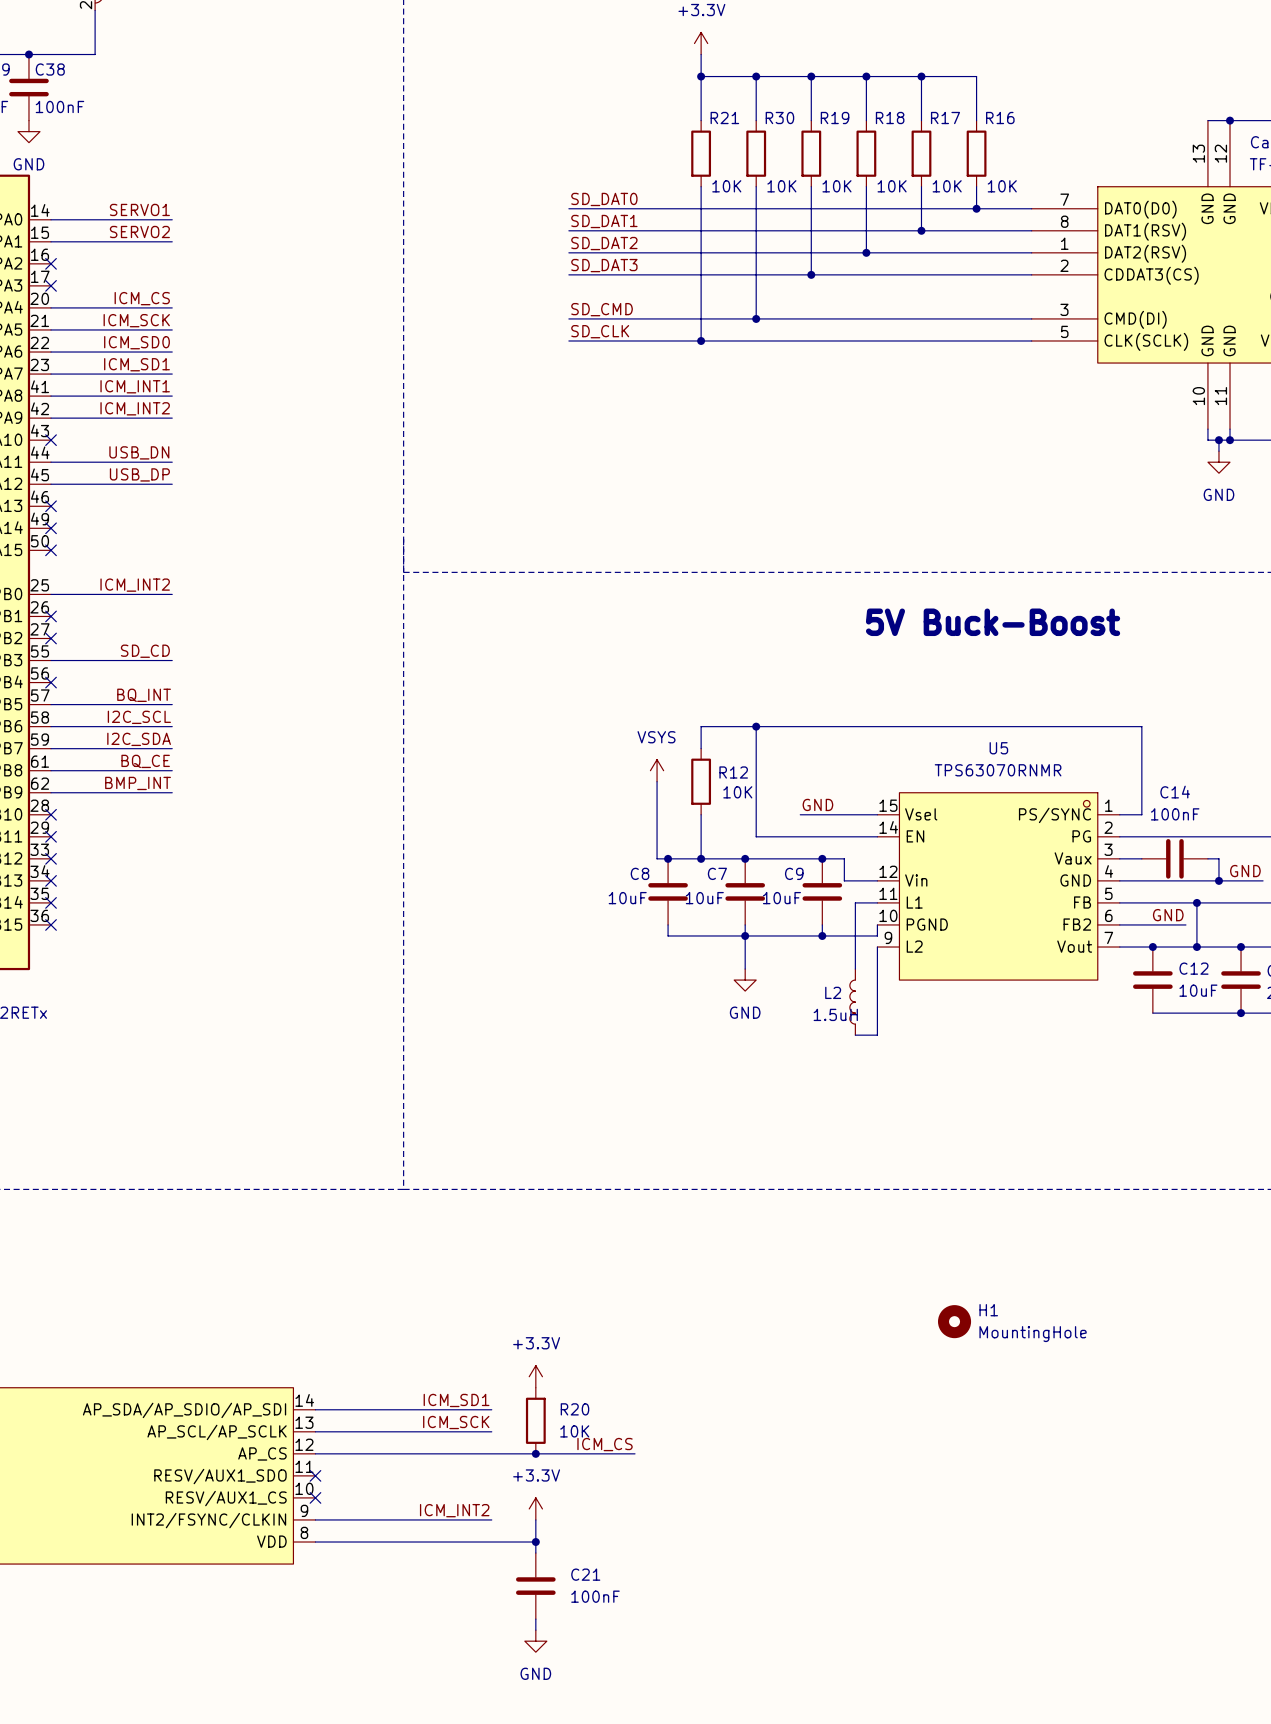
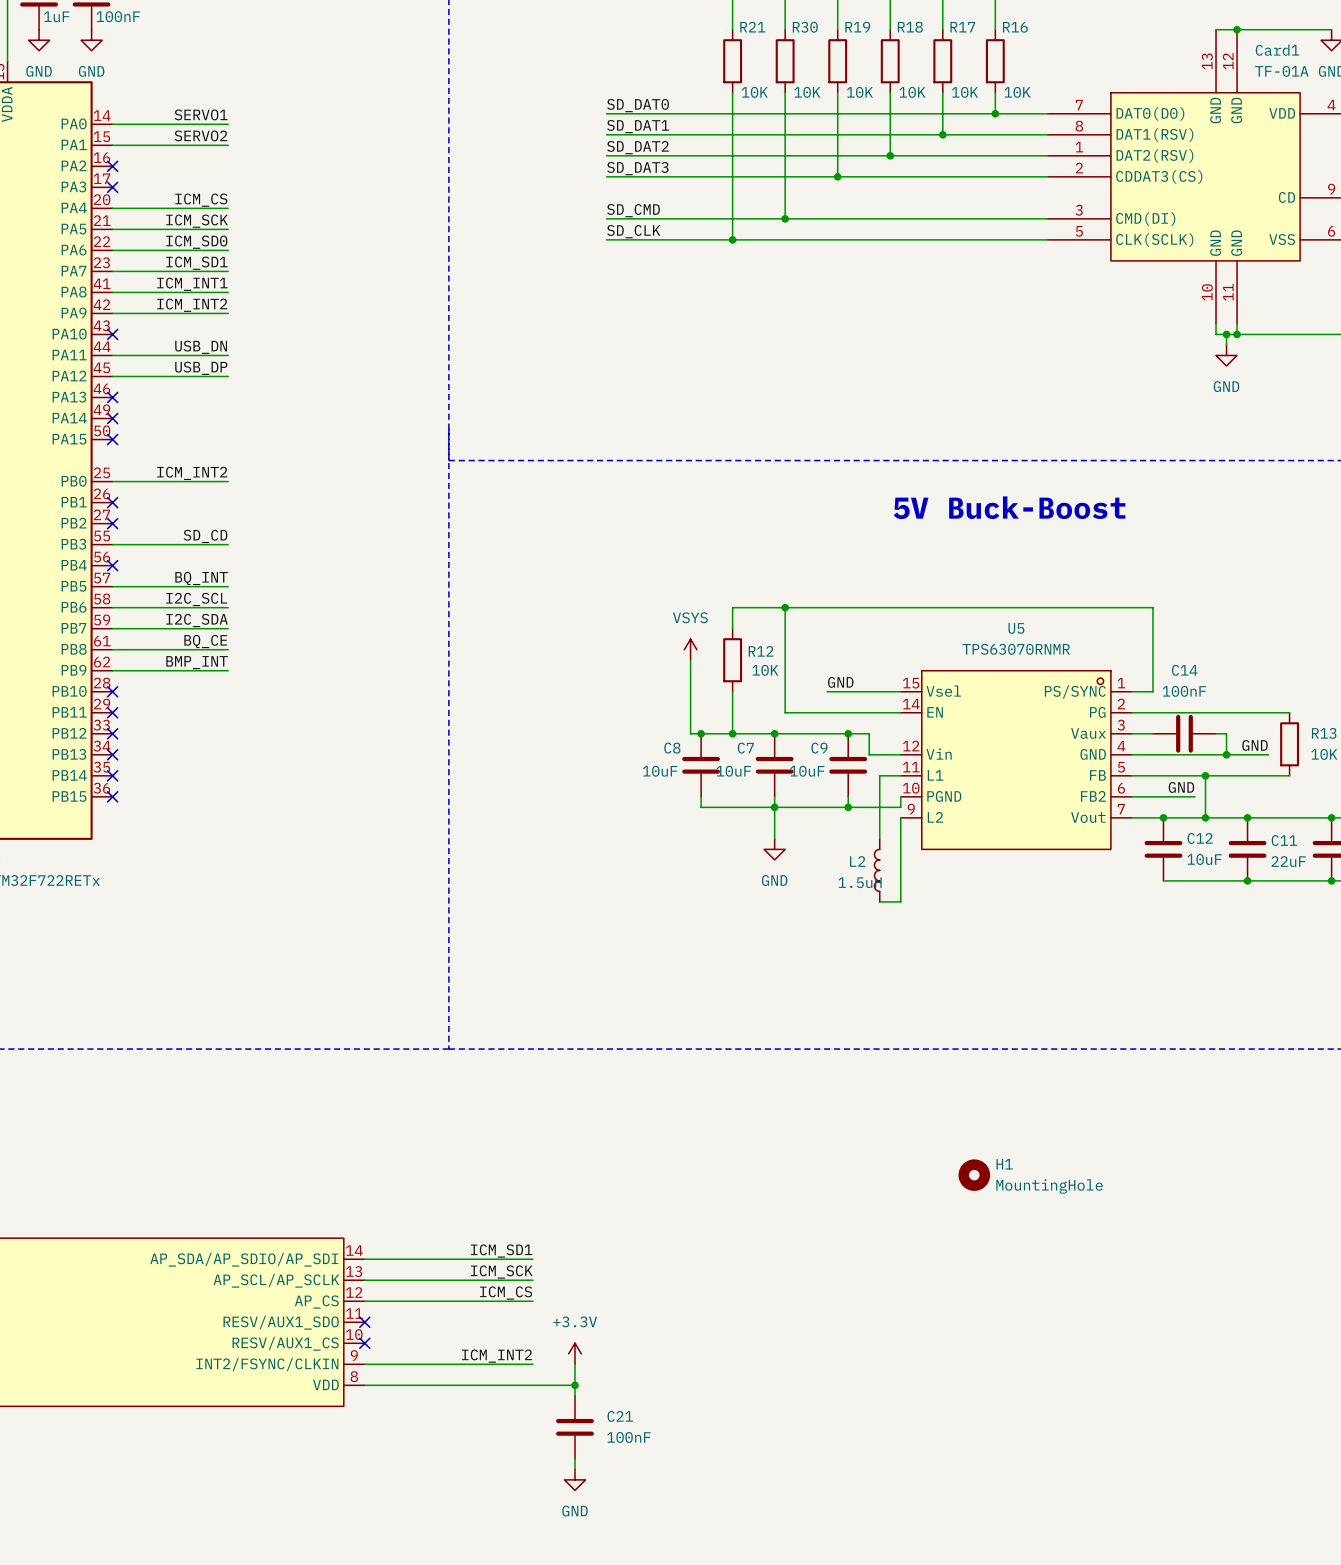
power symbol: +3.3V (535, 1376) -> none
R20: 10K (535, 1420) -> none
label position: ICM_CS (605, 1444) -> ICM_CS (506, 1293)
wire: (491, 1453) (635, 1453) -> none
junction: (535, 1453) -> none

